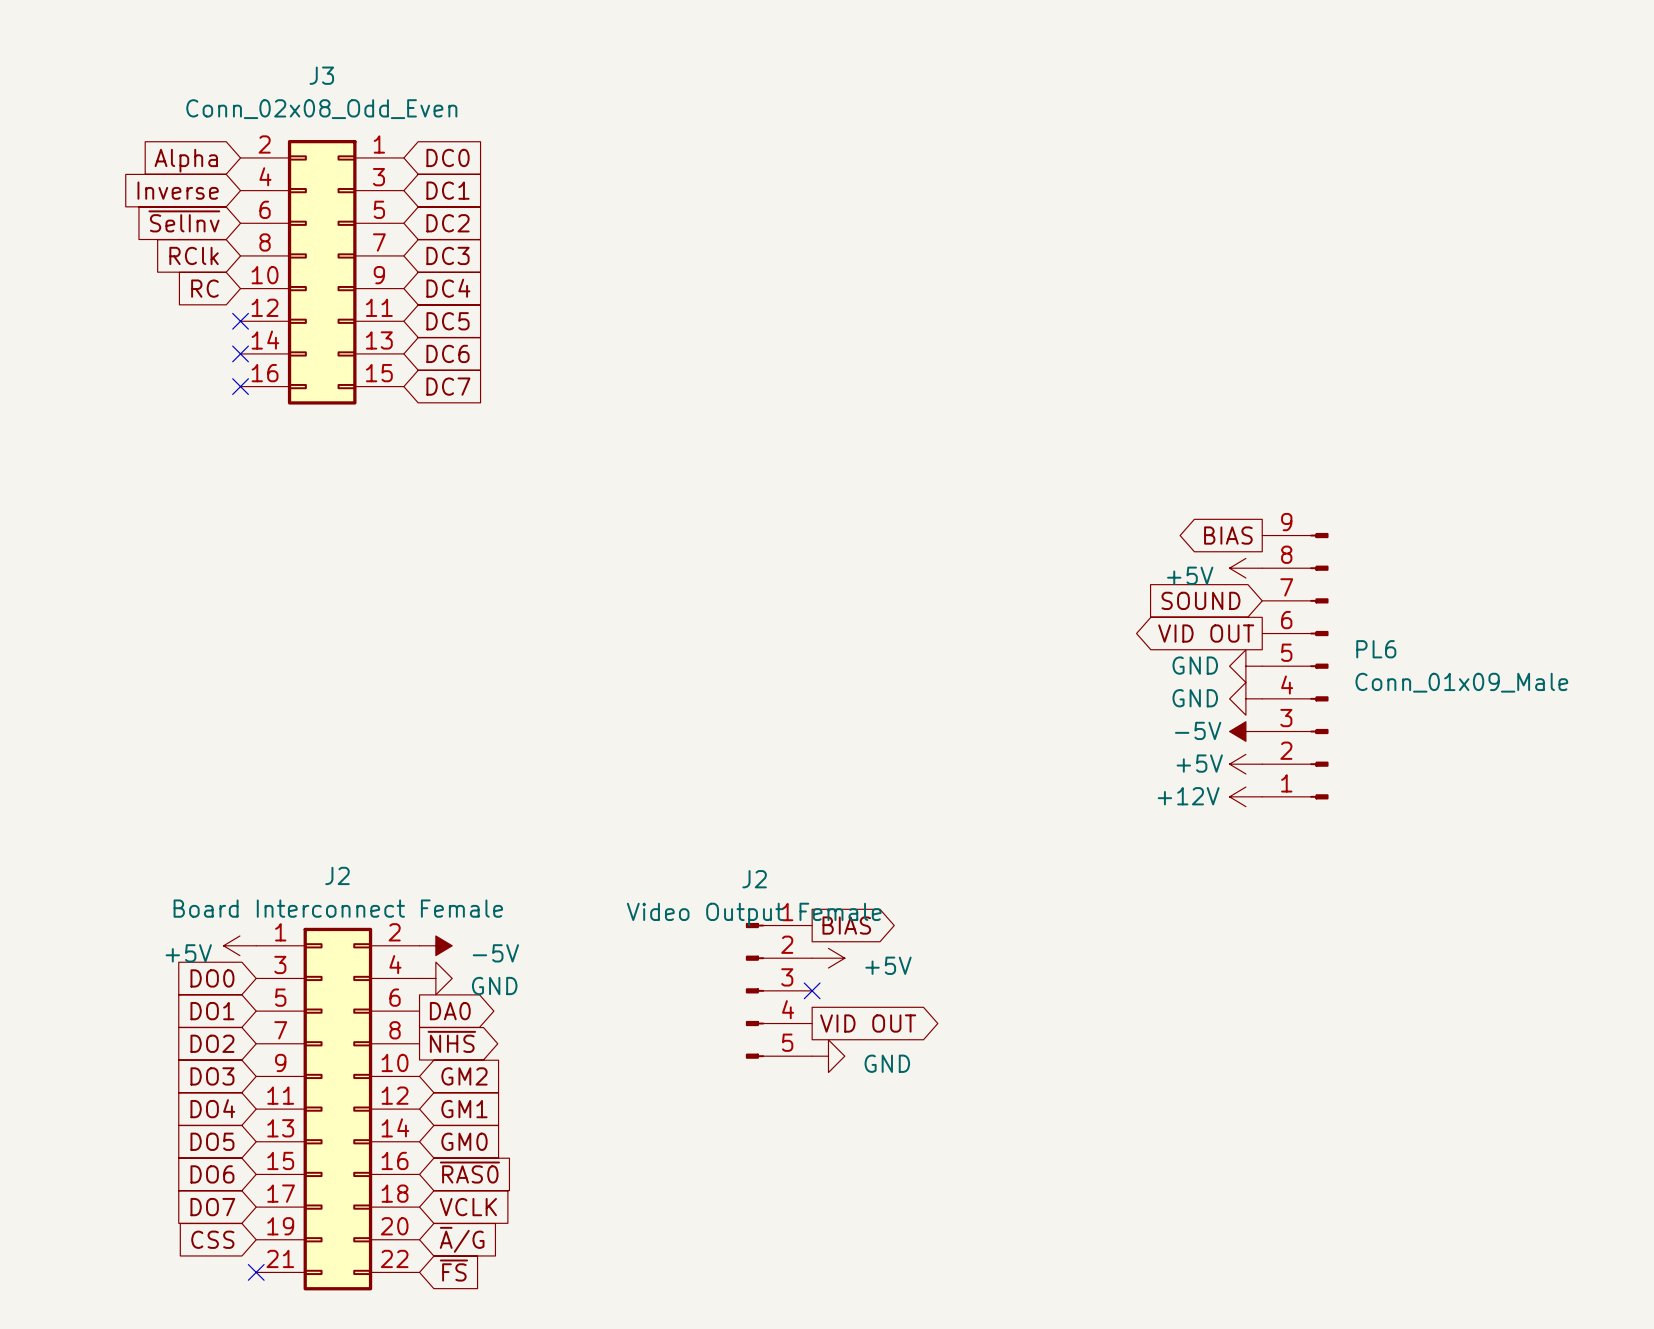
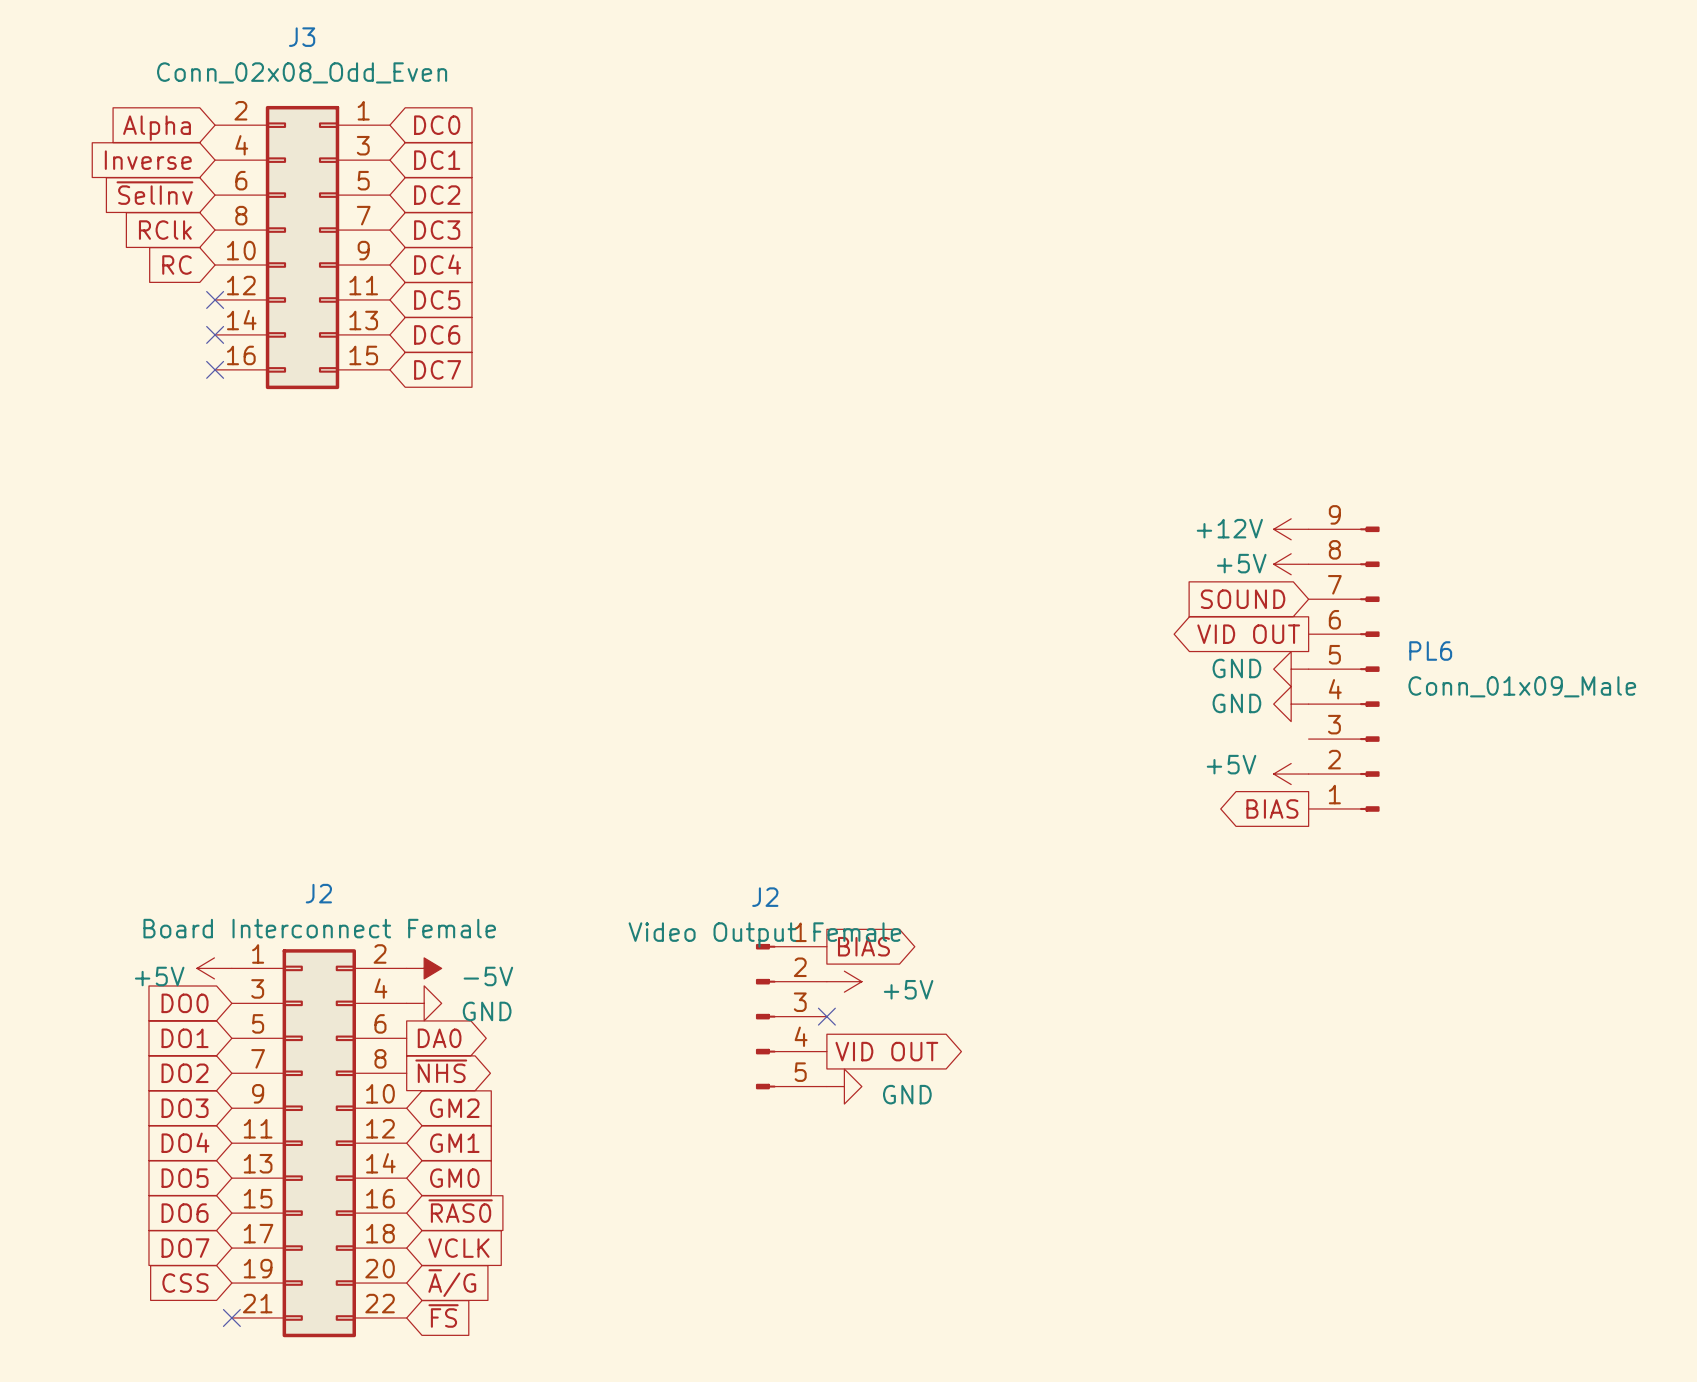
global label position: BIAS (1228, 535) -> BIAS (1272, 808)
power symbol text position: +5V (1190, 575) -> +5V (1241, 563)
power symbol: -5V (1245, 731) -> none
power symbol text position: +5V (1199, 763) -> +5V (1231, 764)
power symbol position: +12V (1245, 796) -> +12V (1291, 529)

